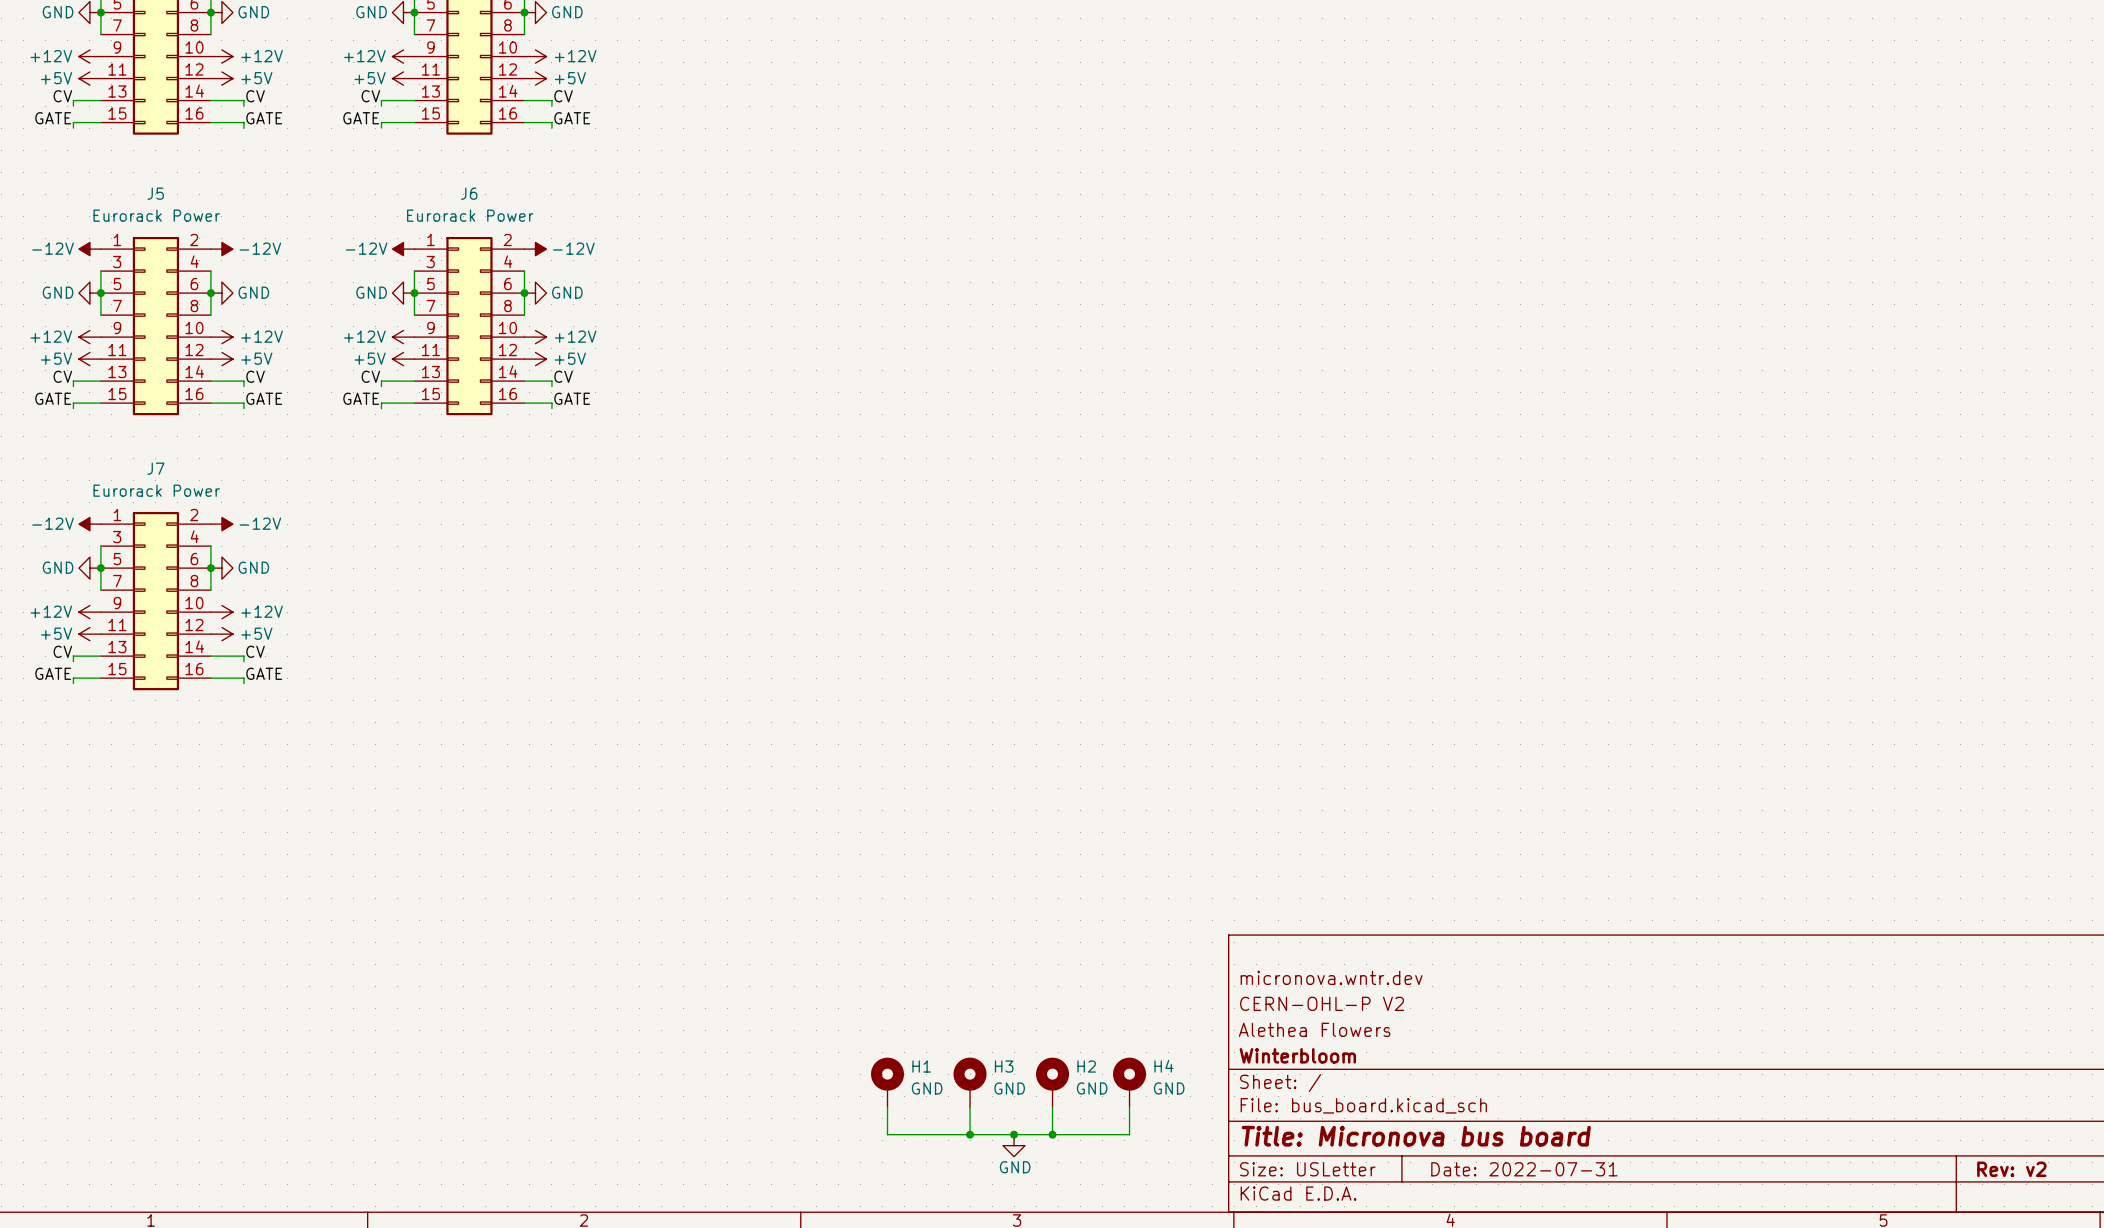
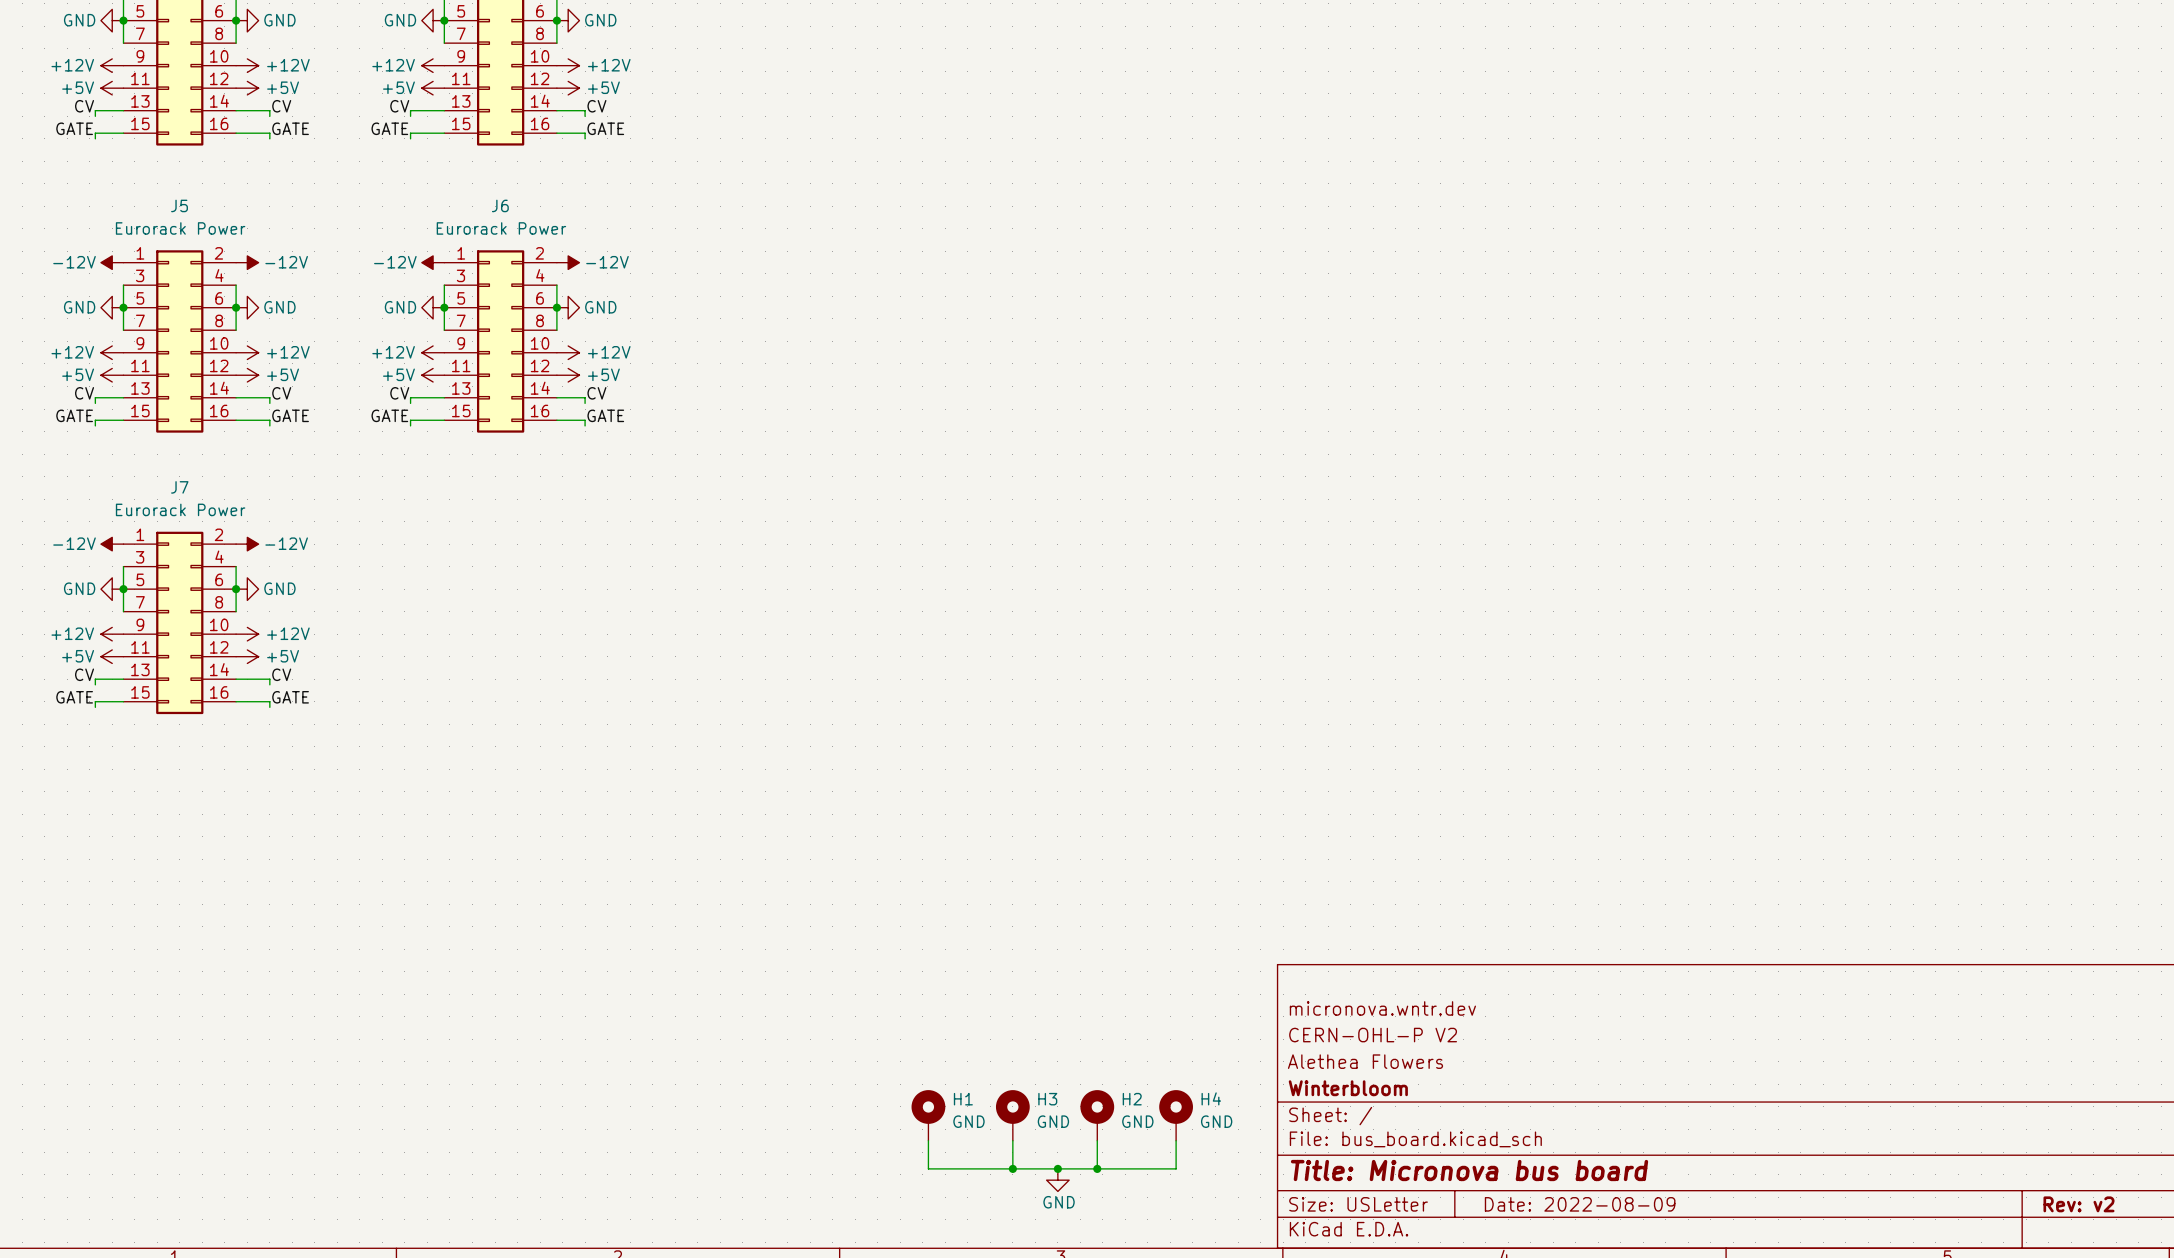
title block: Date: 2022-07-31 (1524, 1169) -> Date: 2022-08-09 (1580, 1204)

